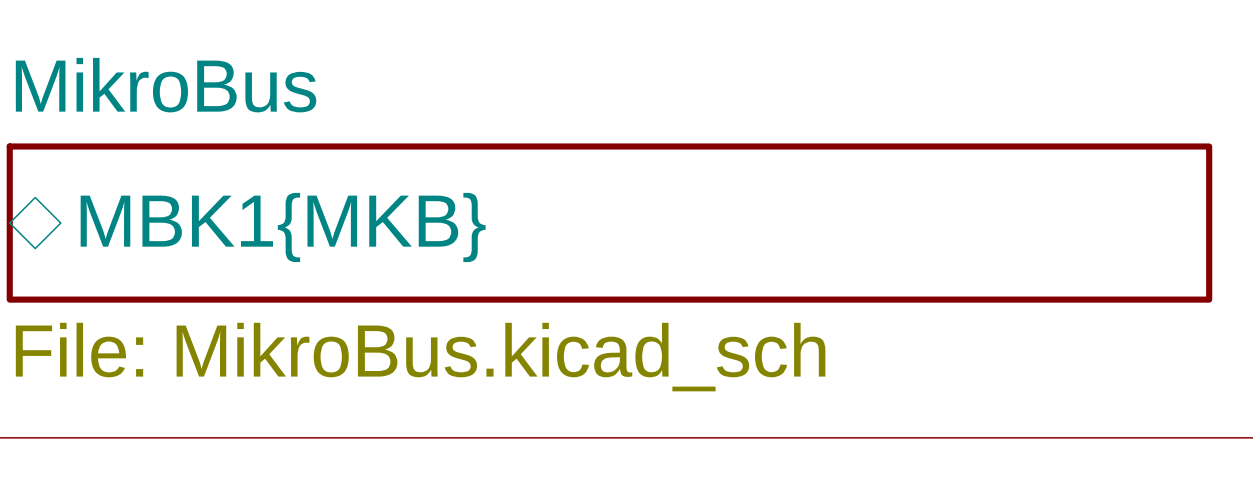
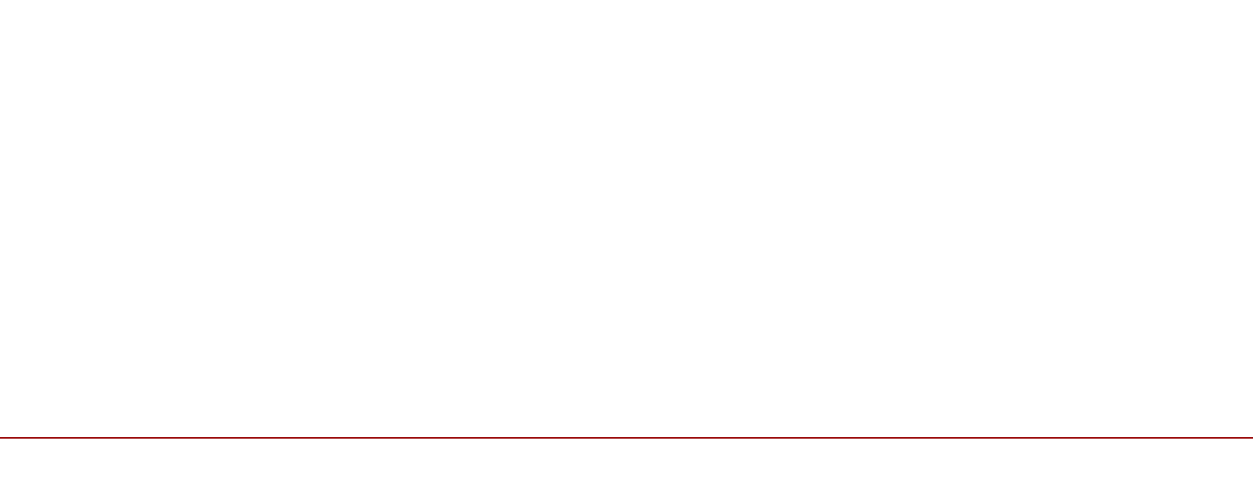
sheet MikroBus: File: MikroBus.kicad_sch (609, 223) -> none
sheet pin: MBK1{MKB} (283, 227) -> none

